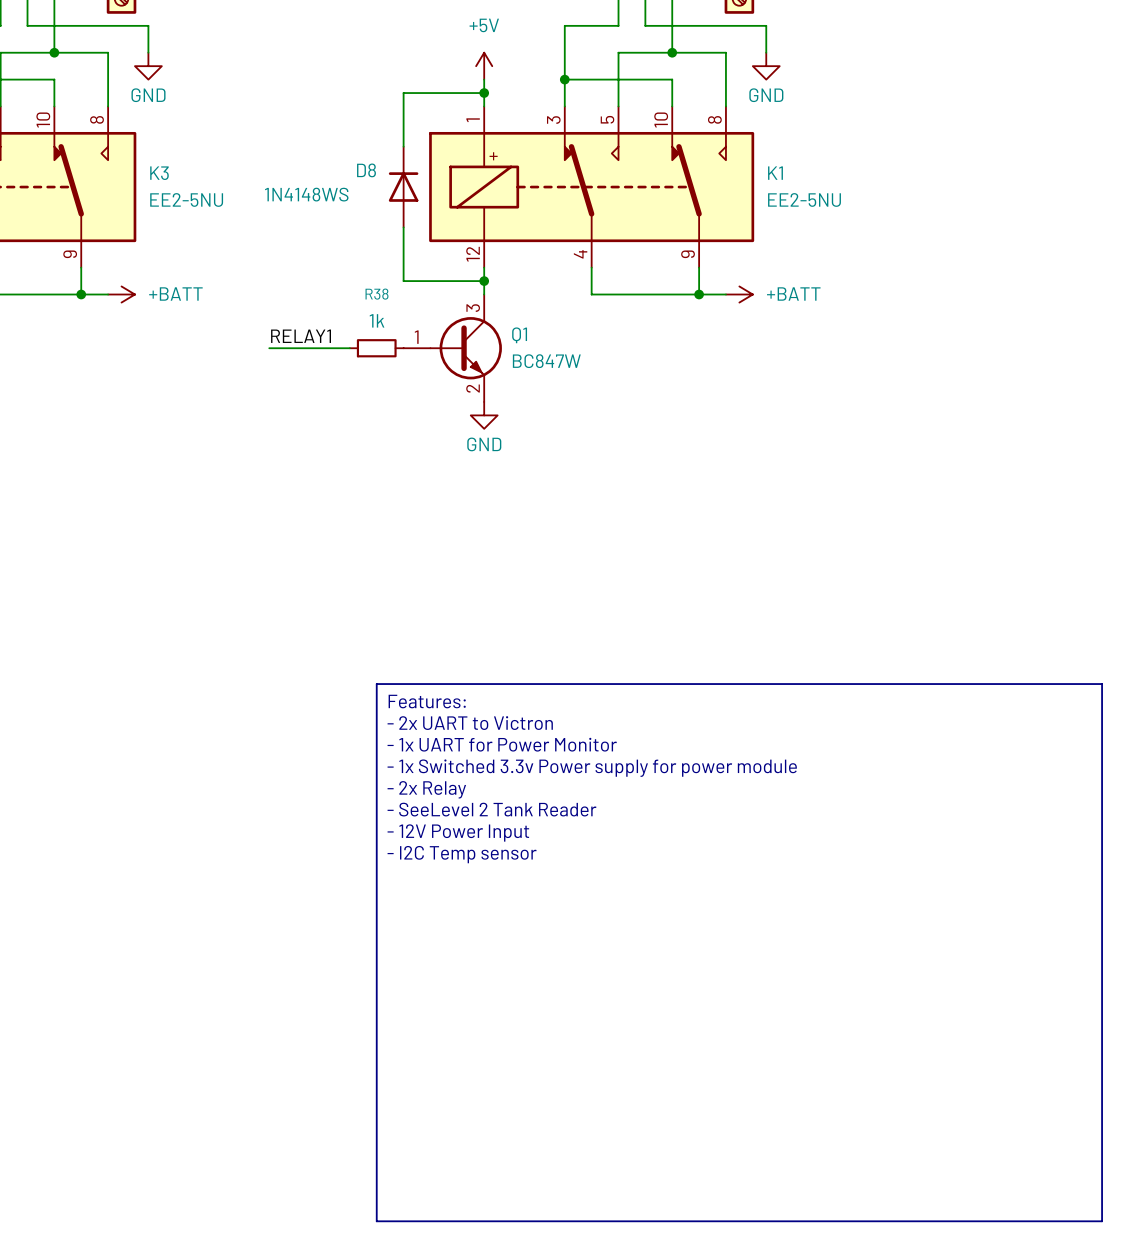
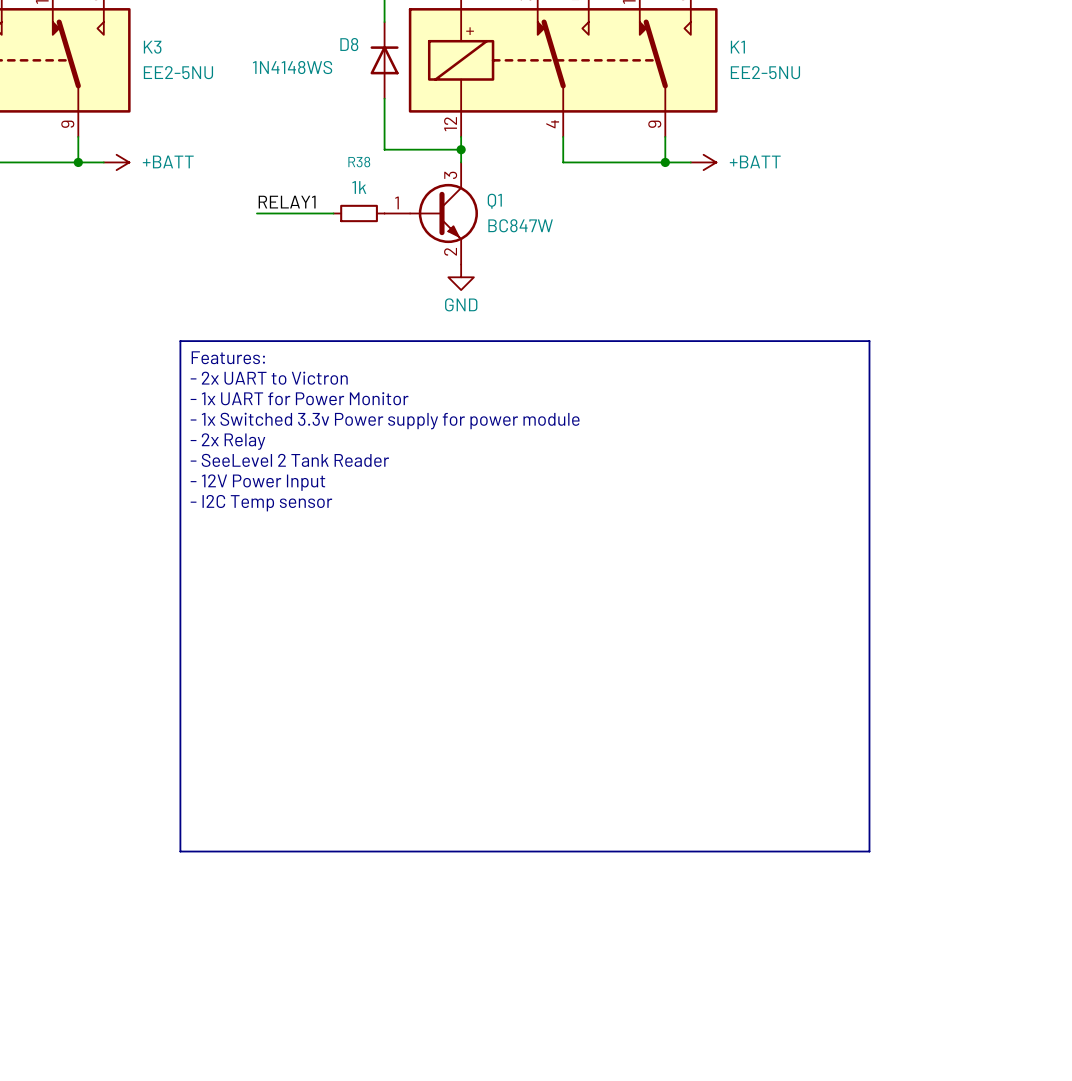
line: none -> (180, 341) (869, 341) (869, 851) (180, 851) (180, 341)
text: none -> Features: (228, 357)
text: none -> - 2x UART to Victron (269, 378)
text: none -> - 1x UART for Power Monitor (299, 398)
text: none -> - 1x Switched 3.3v Power supply for power module (385, 421)
text: none -> - 2x Relay (227, 441)
text: none -> - SeeLevel 2 Tank Reader (289, 460)
text: none -> - 12V Power Input (257, 482)
text: none -> - I2C Temp sensor (261, 503)
line: (376, 684) (1102, 684) (1102, 1221) (376, 1221) (376, 684) -> none
text: Features: (427, 701) -> none
text: - 2x UART to Victron (470, 723) -> none
text: - 1x UART for Power Monitor (502, 744) -> none
text: - 1x Switched 3.3v Power supply for power module (592, 768) -> none
text: - 2x Relay (426, 789) -> none
text: - SeeLevel 2 Tank Reader (491, 809) -> none
text: - 12V Power Input (458, 832) -> none
text: - I2C Temp sensor (462, 854) -> none

